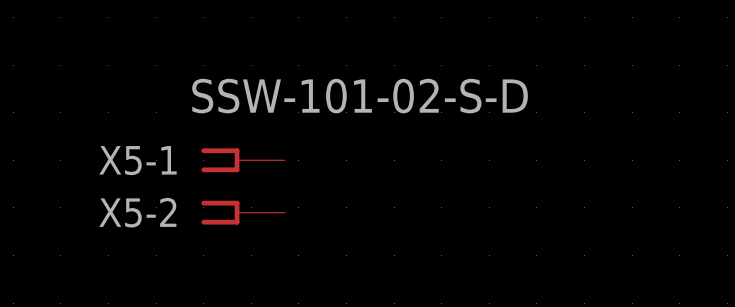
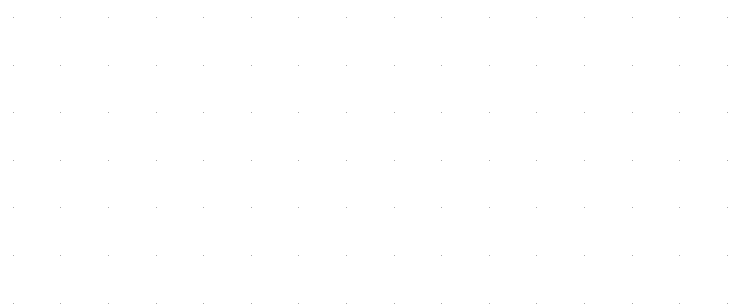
X5-1: SSW-101-02-S-D (243, 160) -> none
X5-2: (243, 212) -> none

